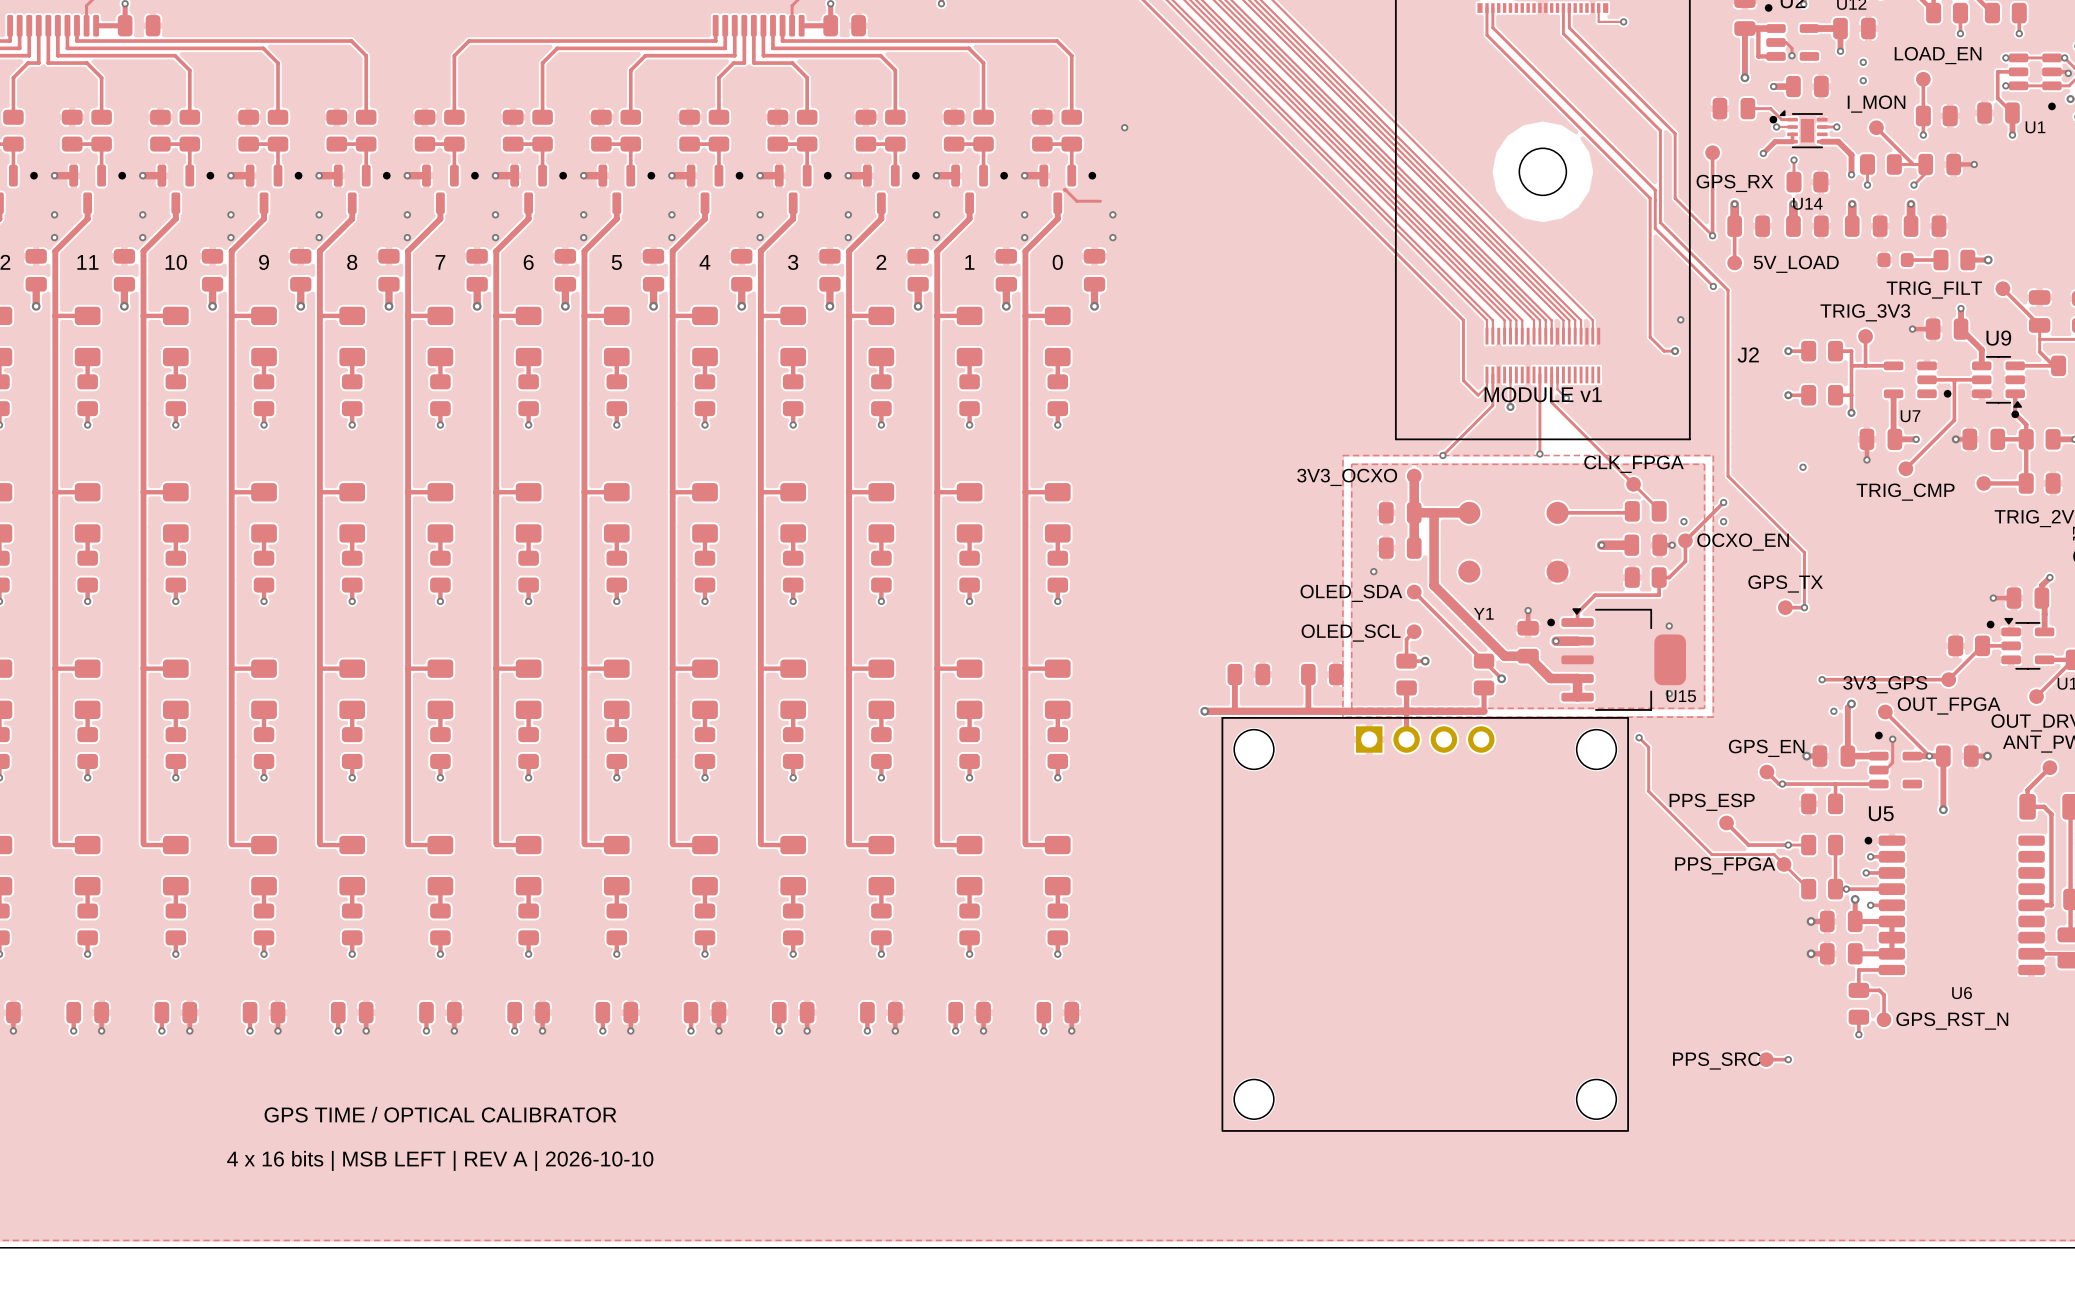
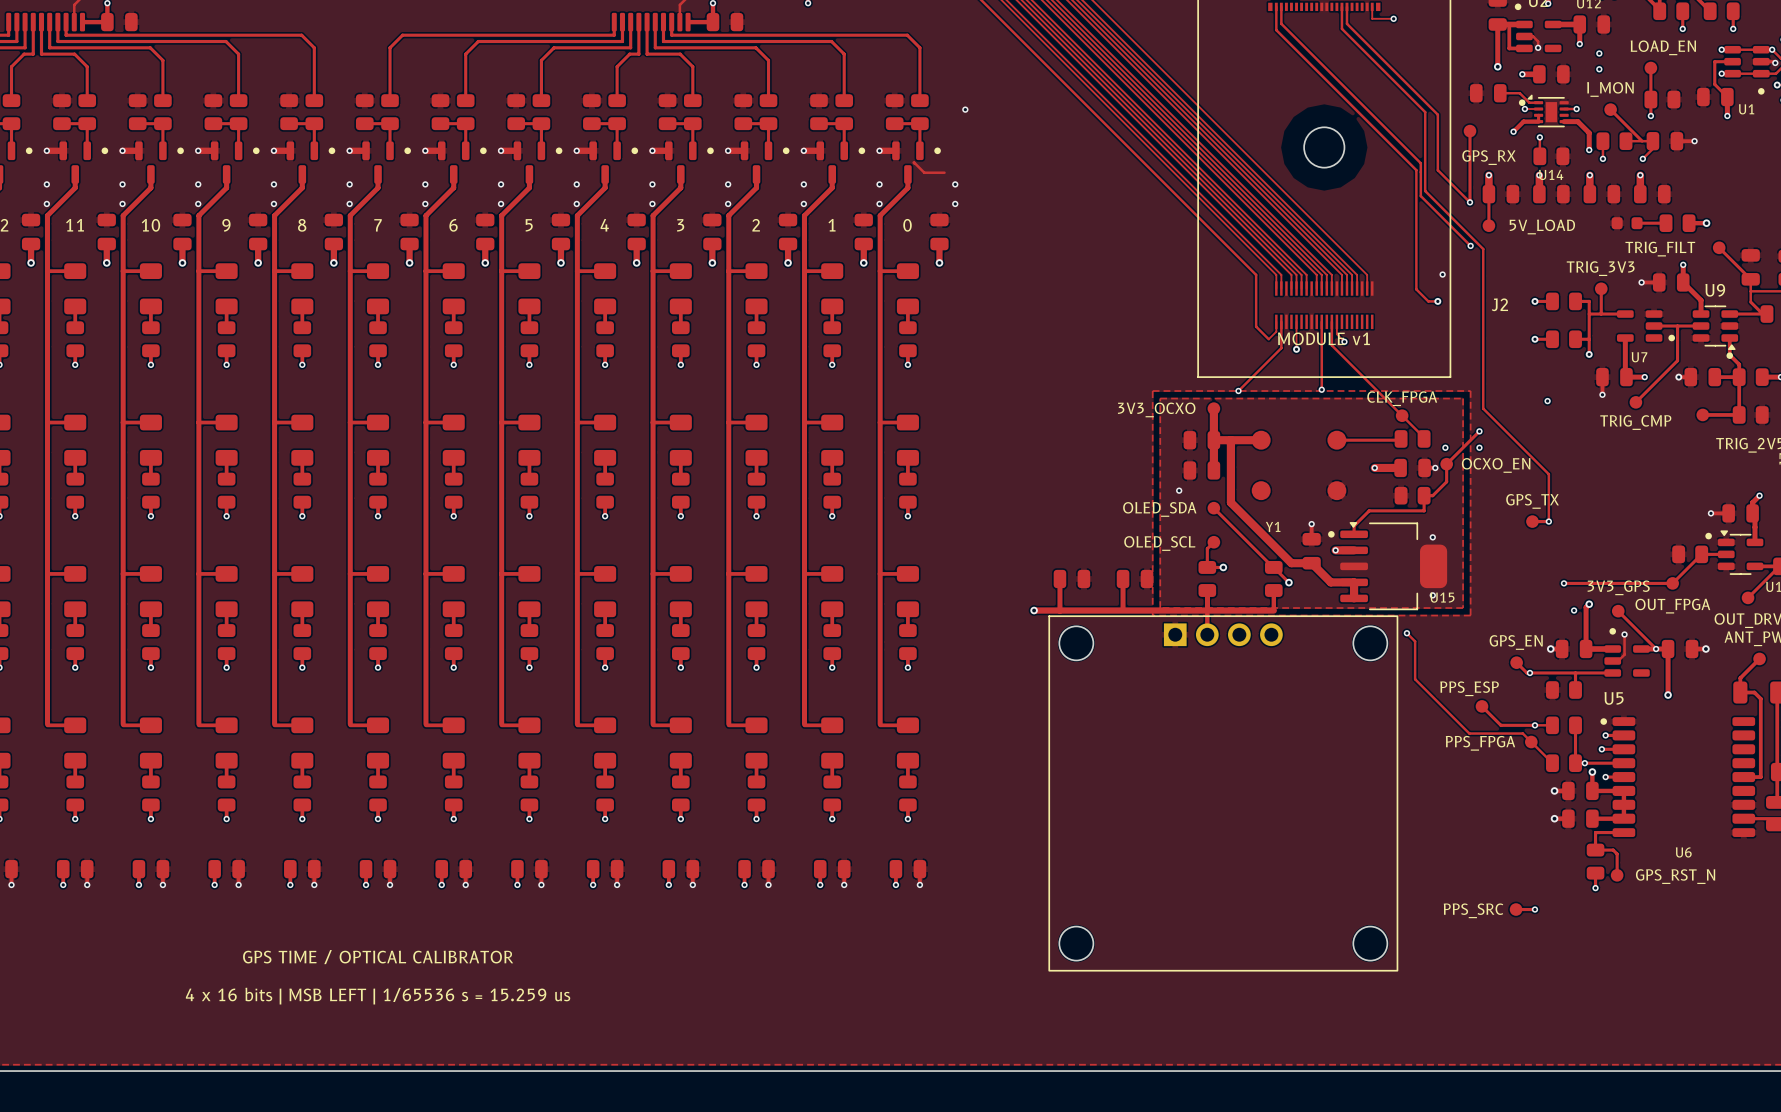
text: 4 x 16 bits | MSB LEFT | REV A | 2026-10-10 (440, 1160) -> 4 x 16 bits | MSB LEFT | 1/65536 s = 15.259 us (378, 996)

